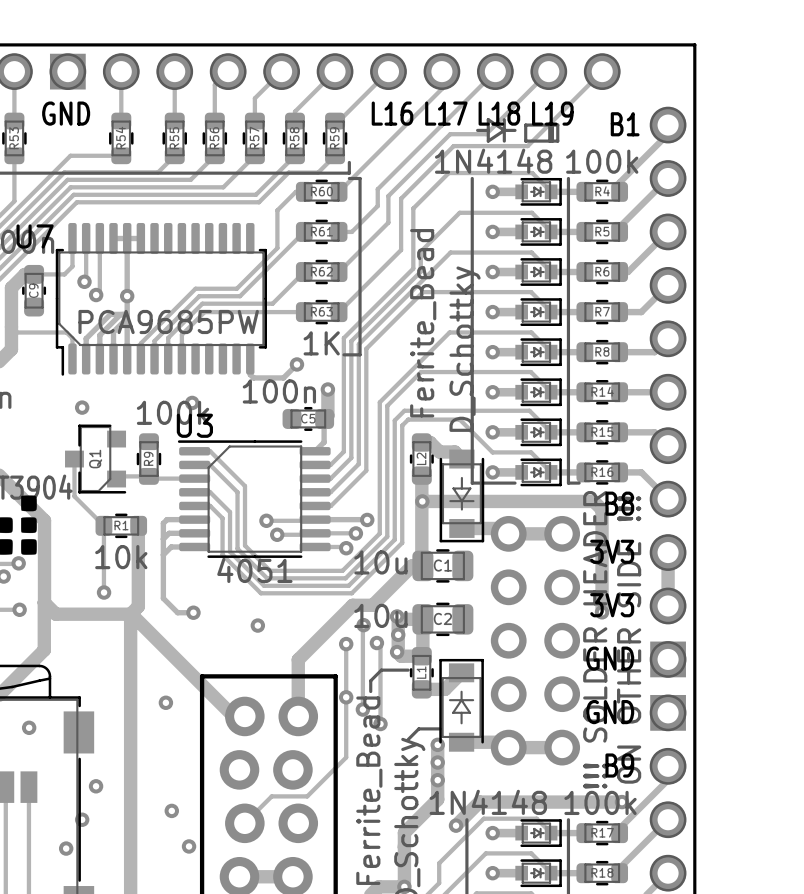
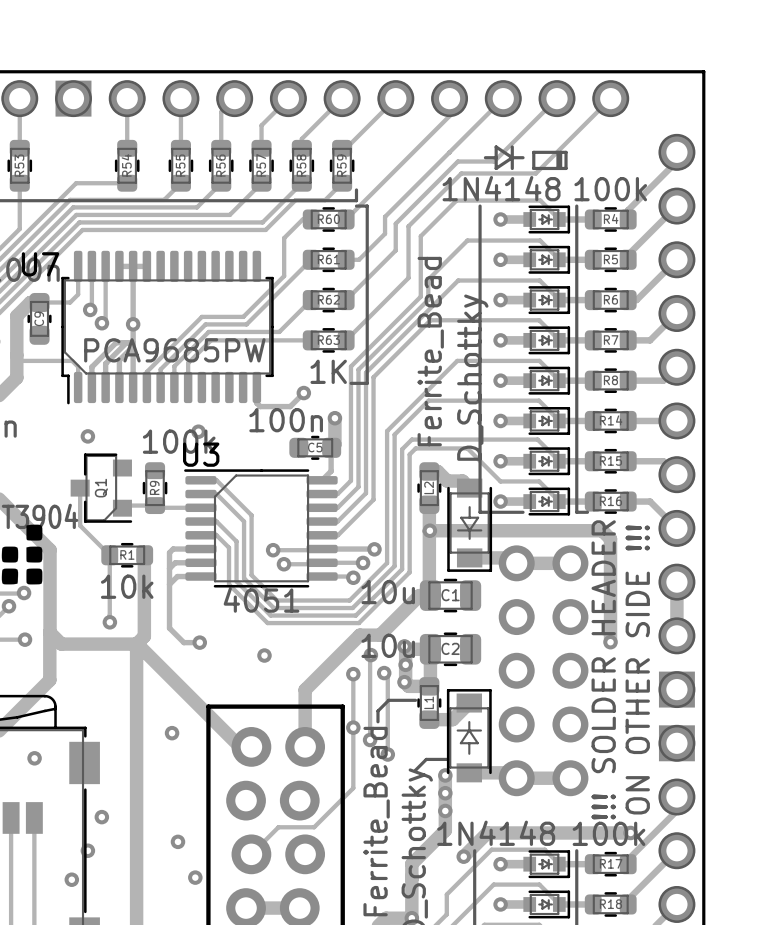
text: GND (66, 113) -> none
text: L16 (392, 113) -> none
text: L17 (446, 113) -> none
text: L18 (499, 113) -> none
text: L19 (552, 113) -> none
text: B1 (625, 124) -> none
text: B8 (619, 503) -> none
text: 3V3 (612, 551) -> none
text: 3V3 (612, 605) -> none
text: GND (610, 658) -> none
text: GND (610, 712) -> none
text: B9 (619, 765) -> none

